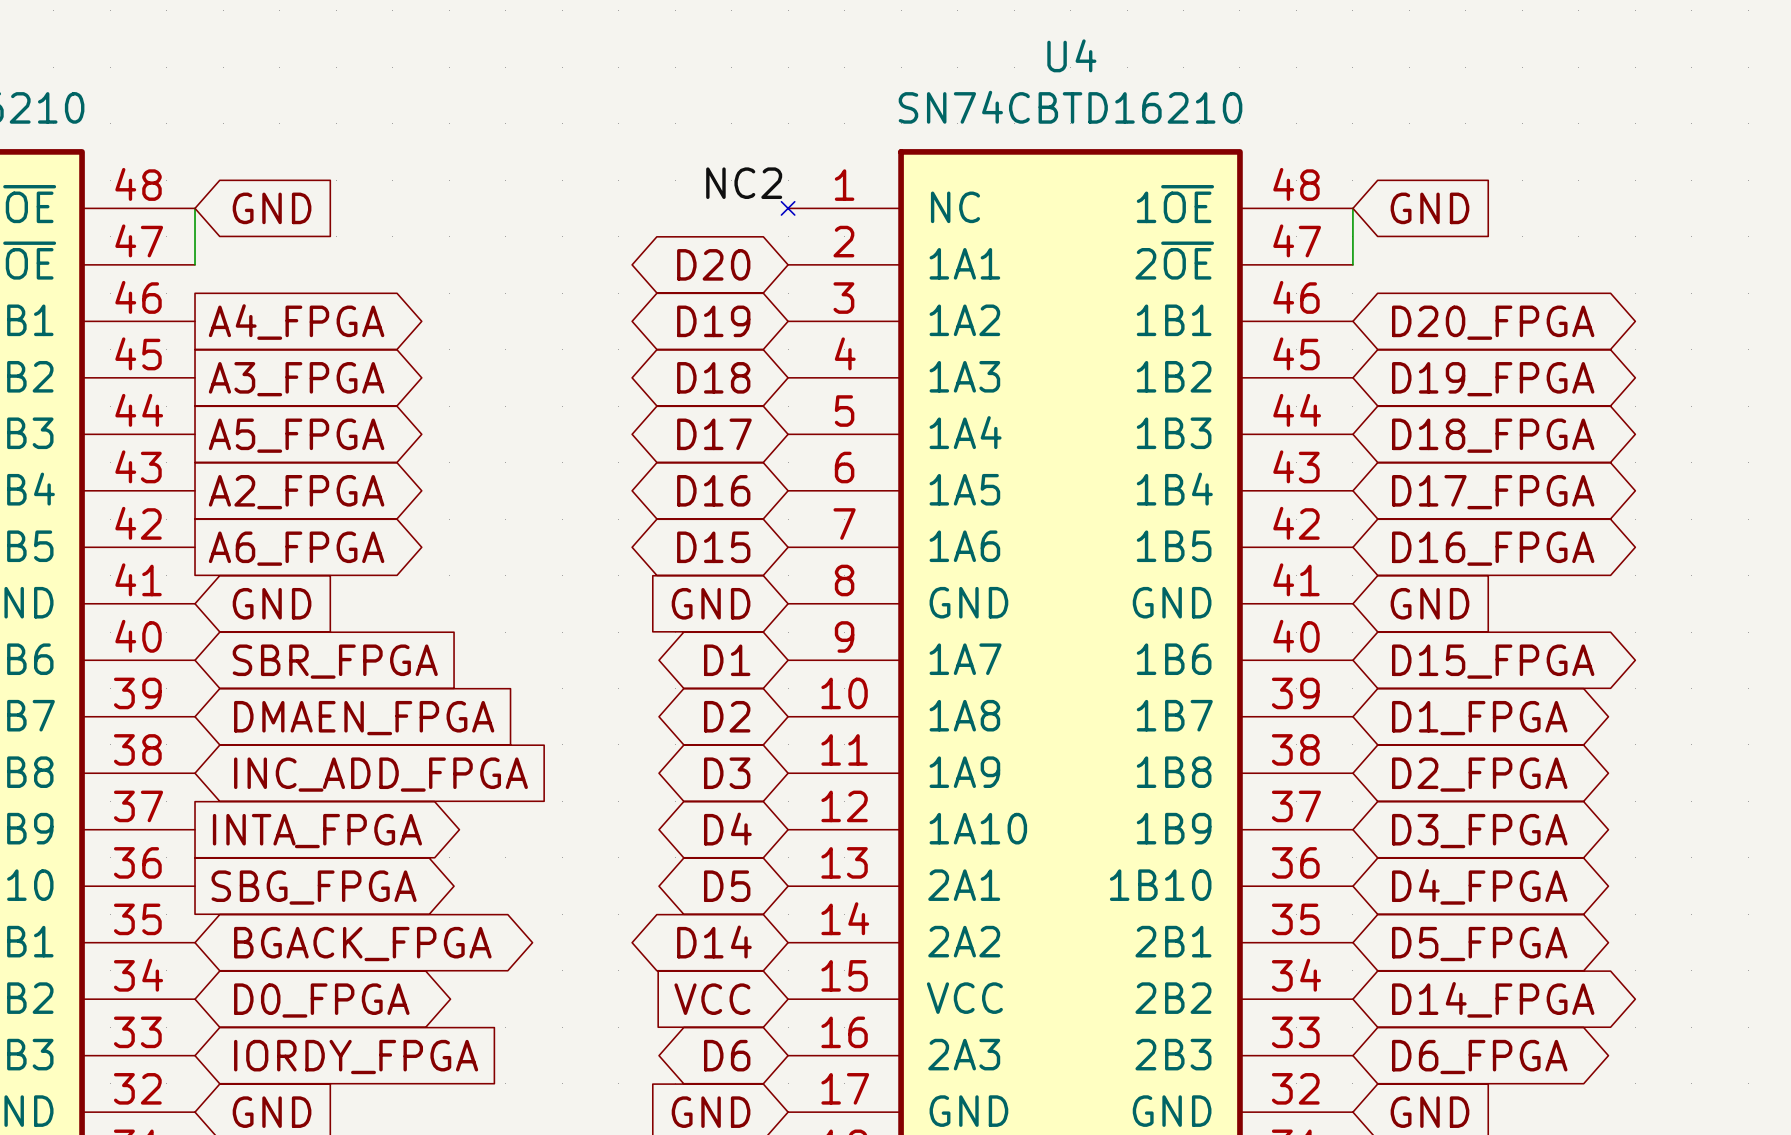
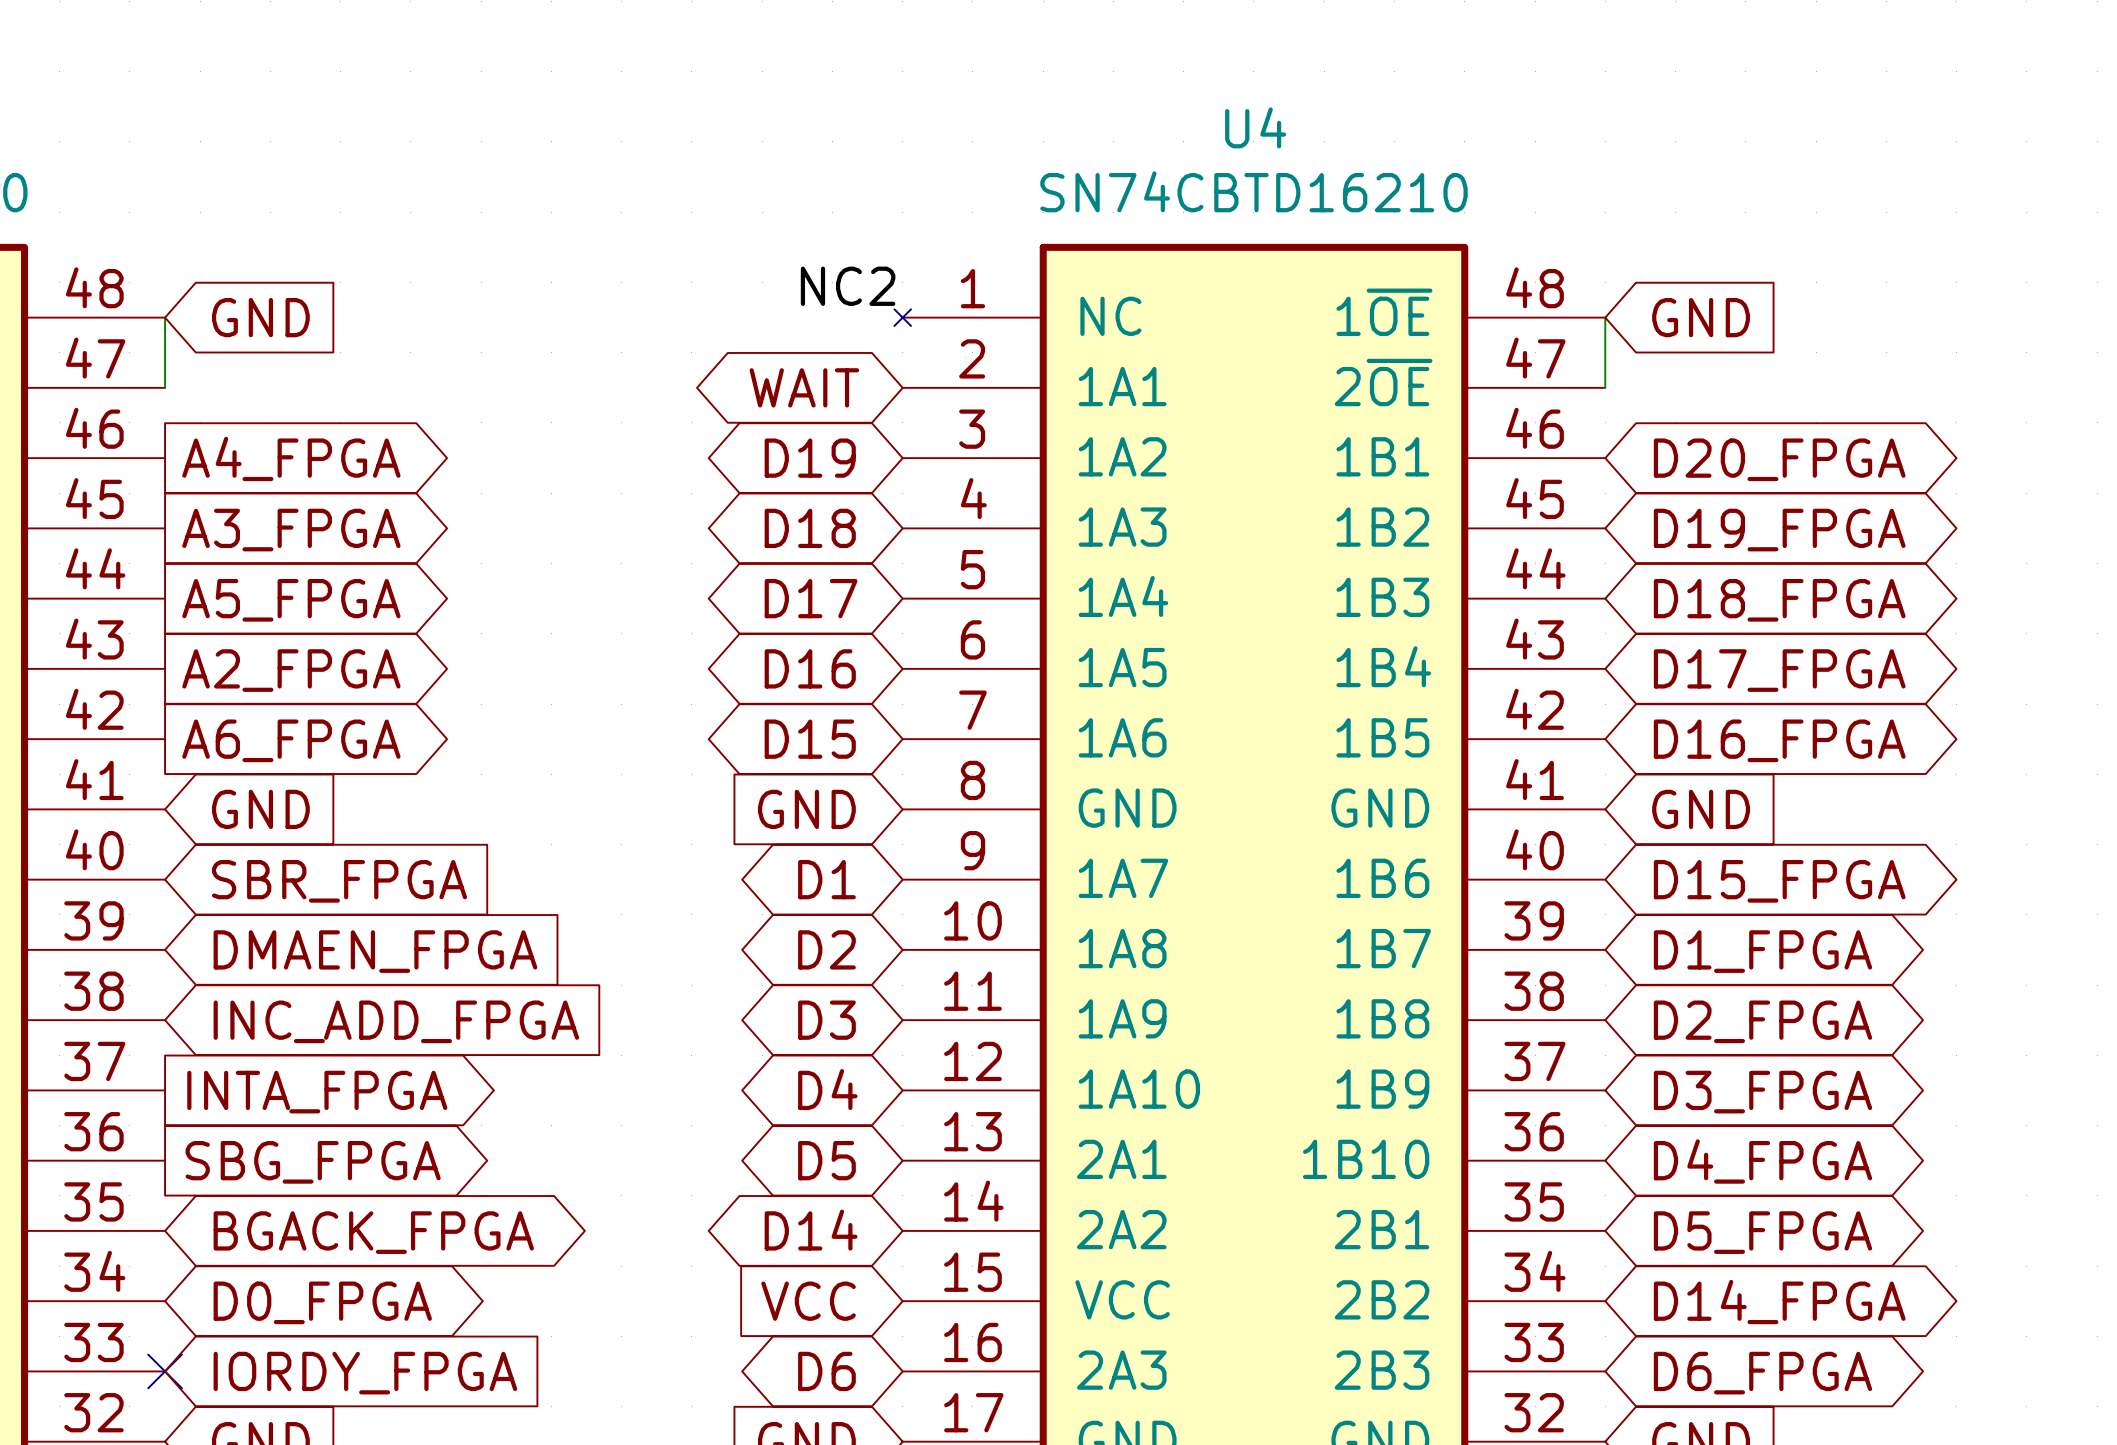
global label: D20 (713, 264) -> WAIT (804, 387)
no-connect mark: none -> (165, 1371)

